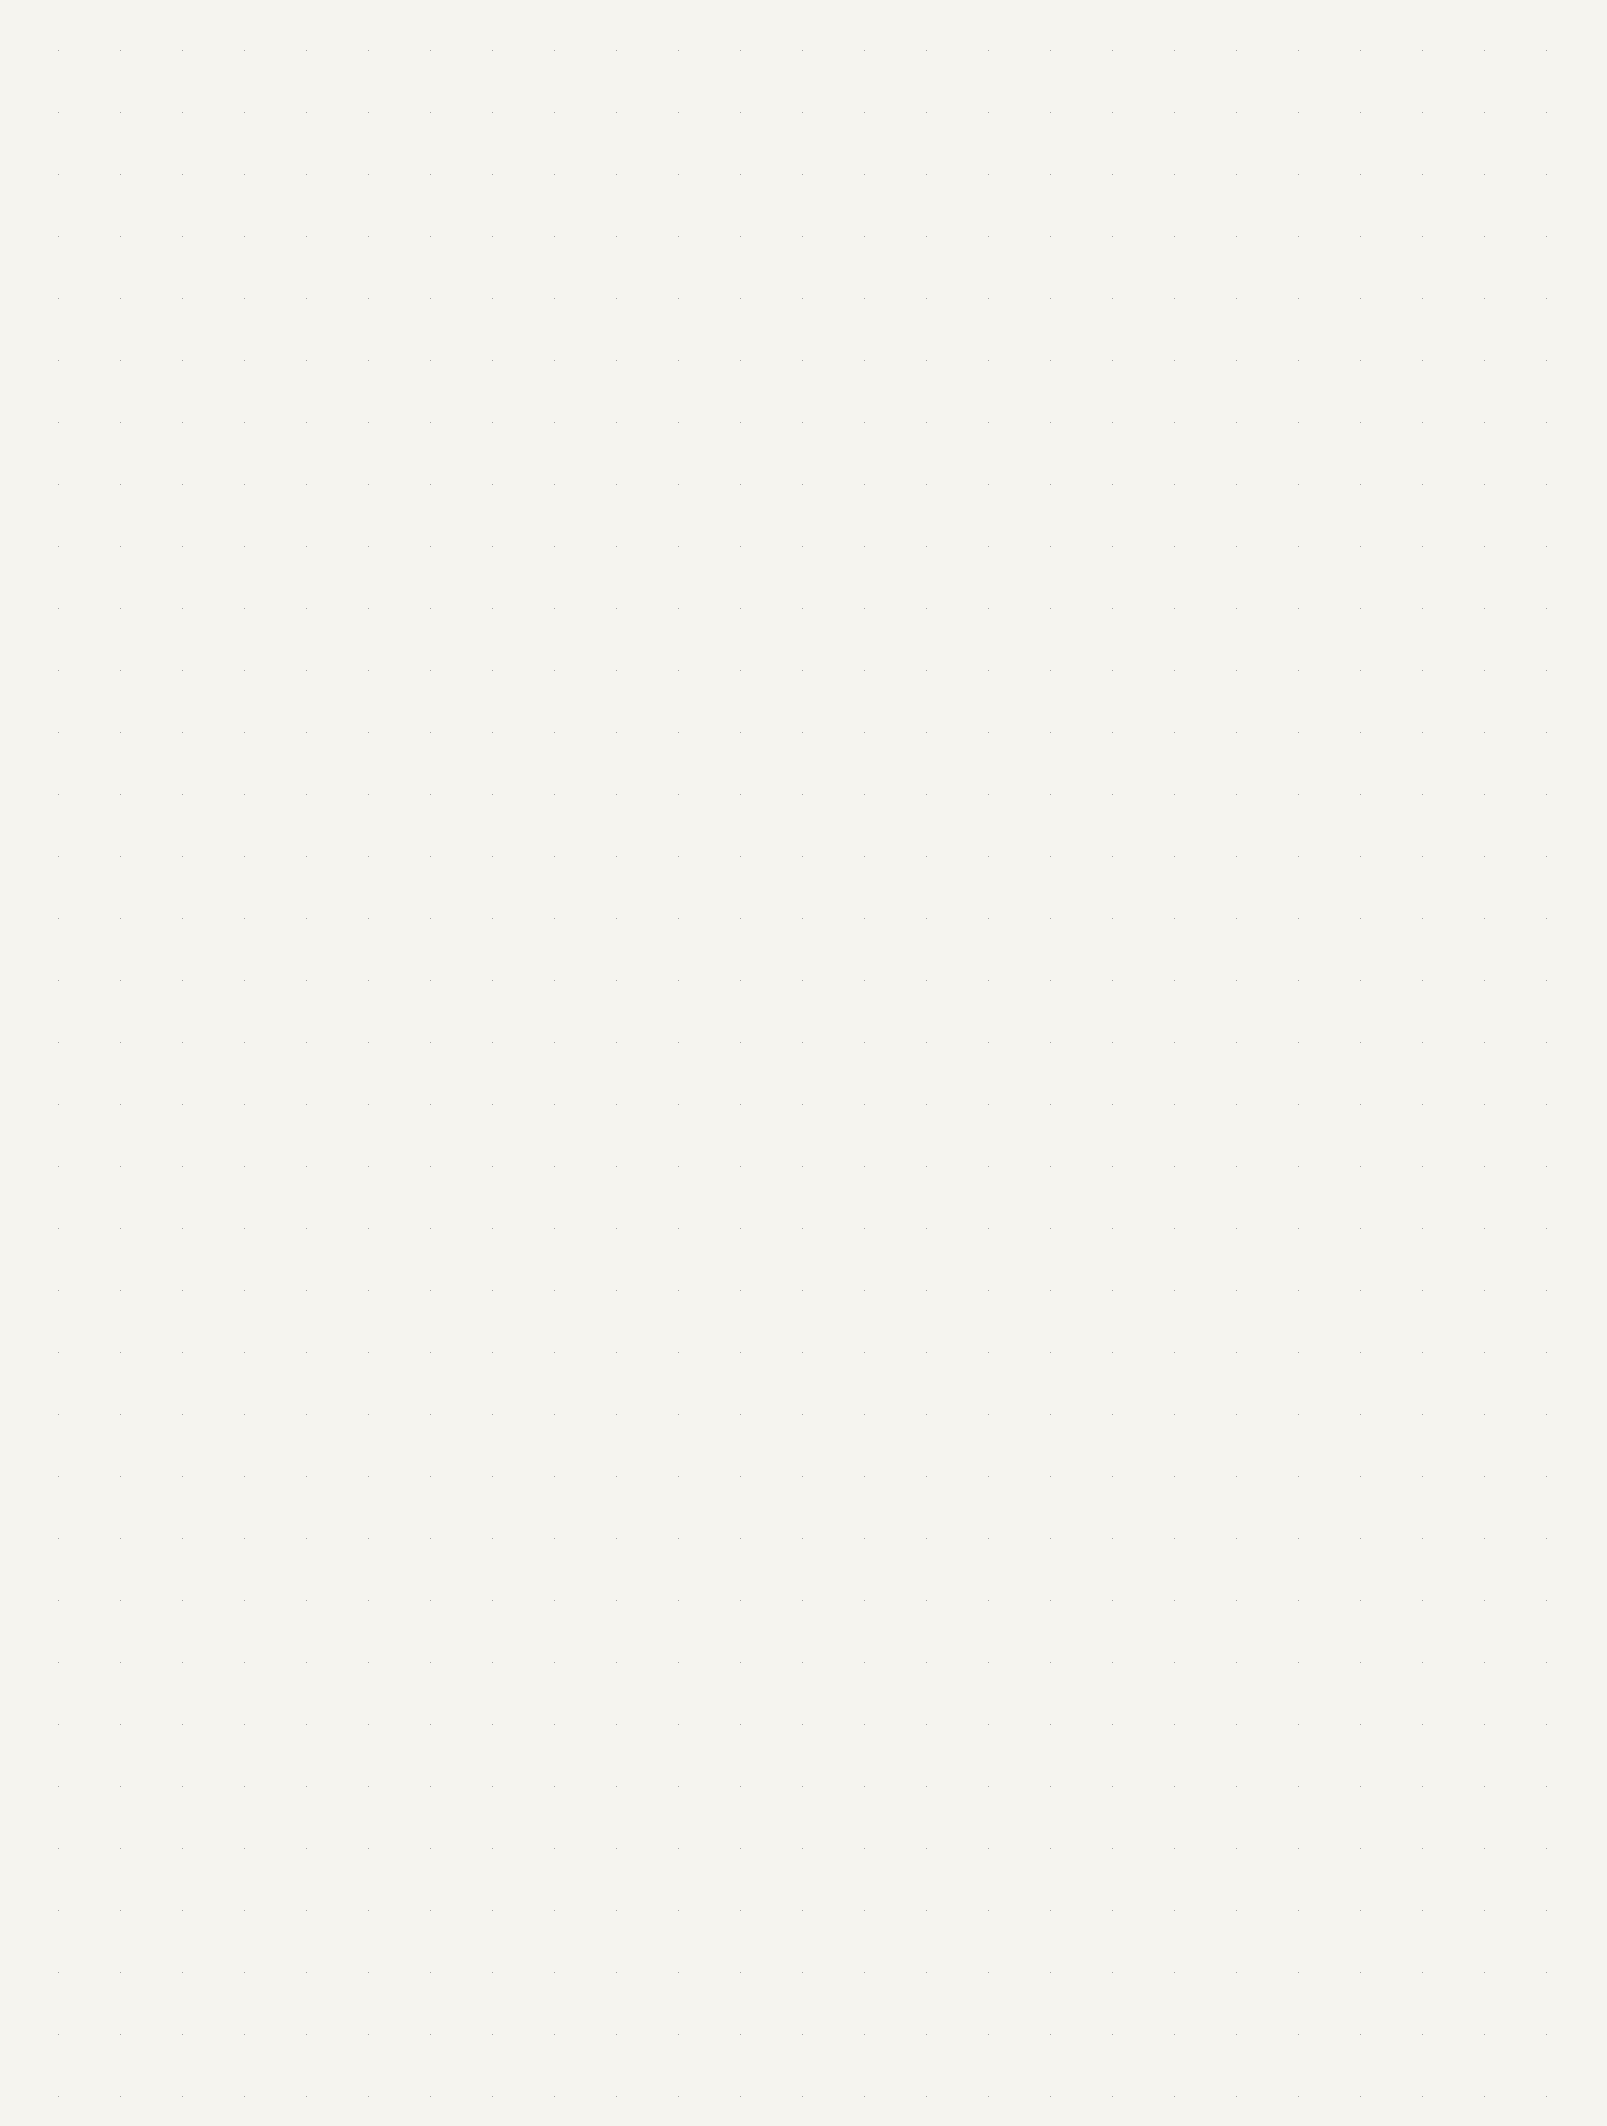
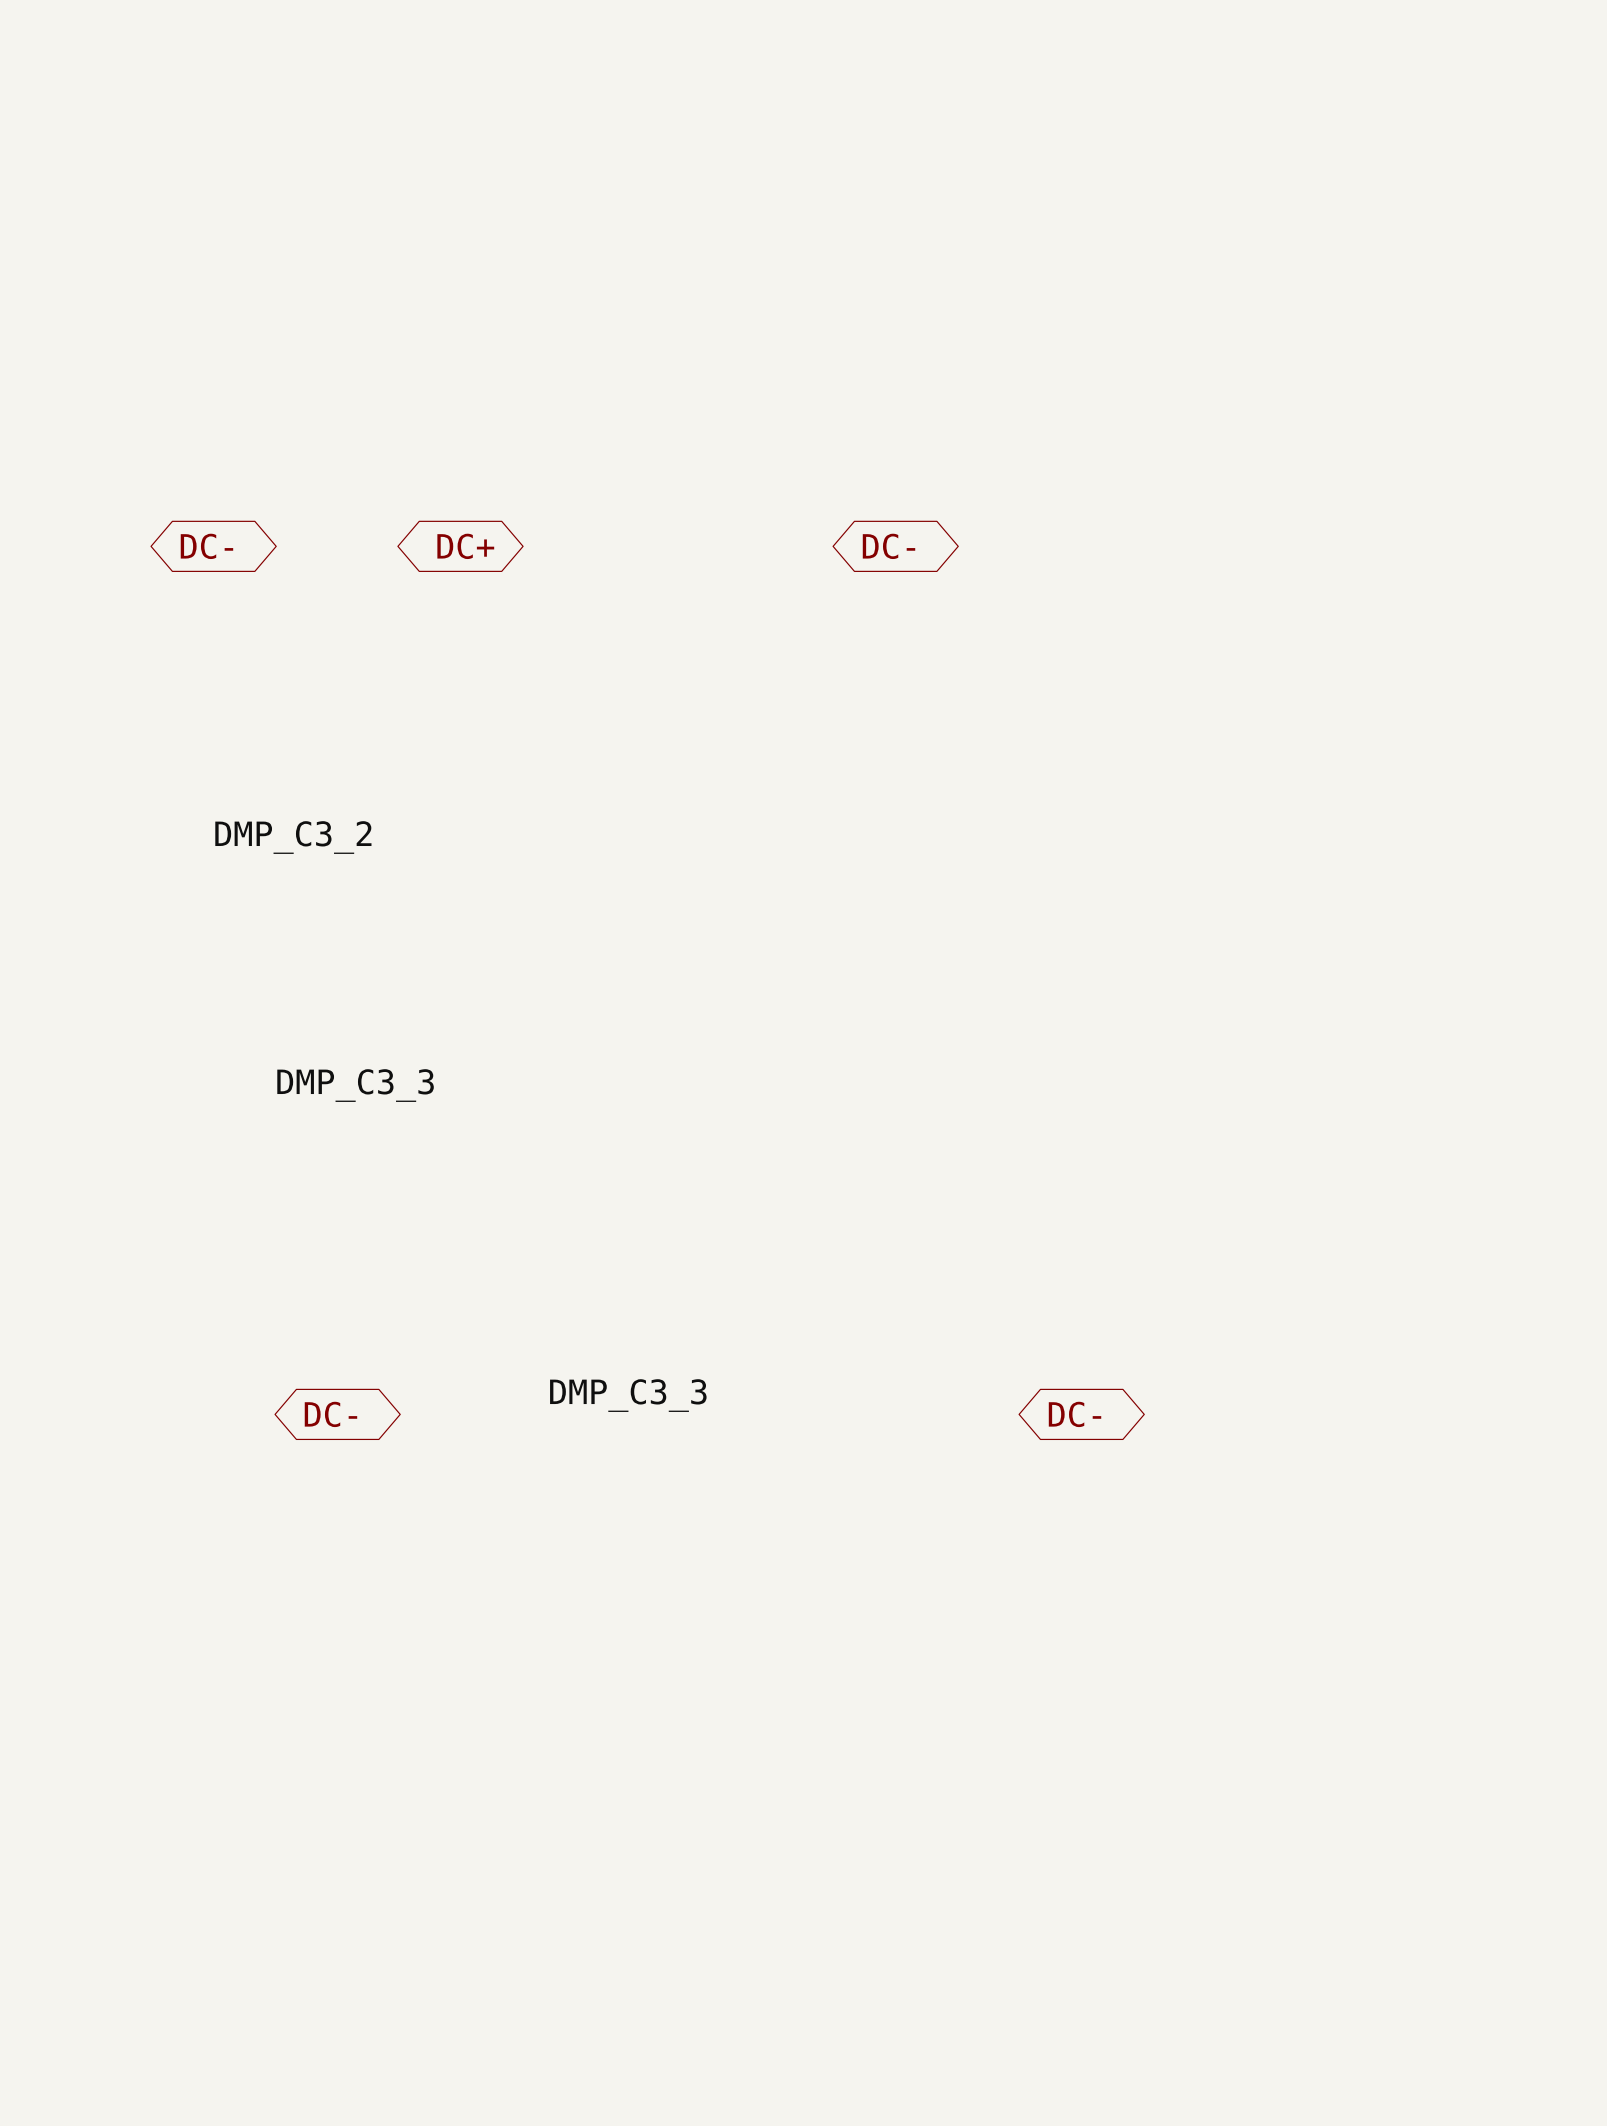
global label: none -> DC- (206, 546)
global label: none -> DC+ (465, 546)
global label: none -> DC- (889, 546)
label: none -> DMP_C3_2 (293, 837)
label: none -> DMP_C3_3 (355, 1085)
label: none -> DMP_C3_3 (628, 1395)
global label: none -> DC- (330, 1414)
global label: none -> DC- (1075, 1414)

